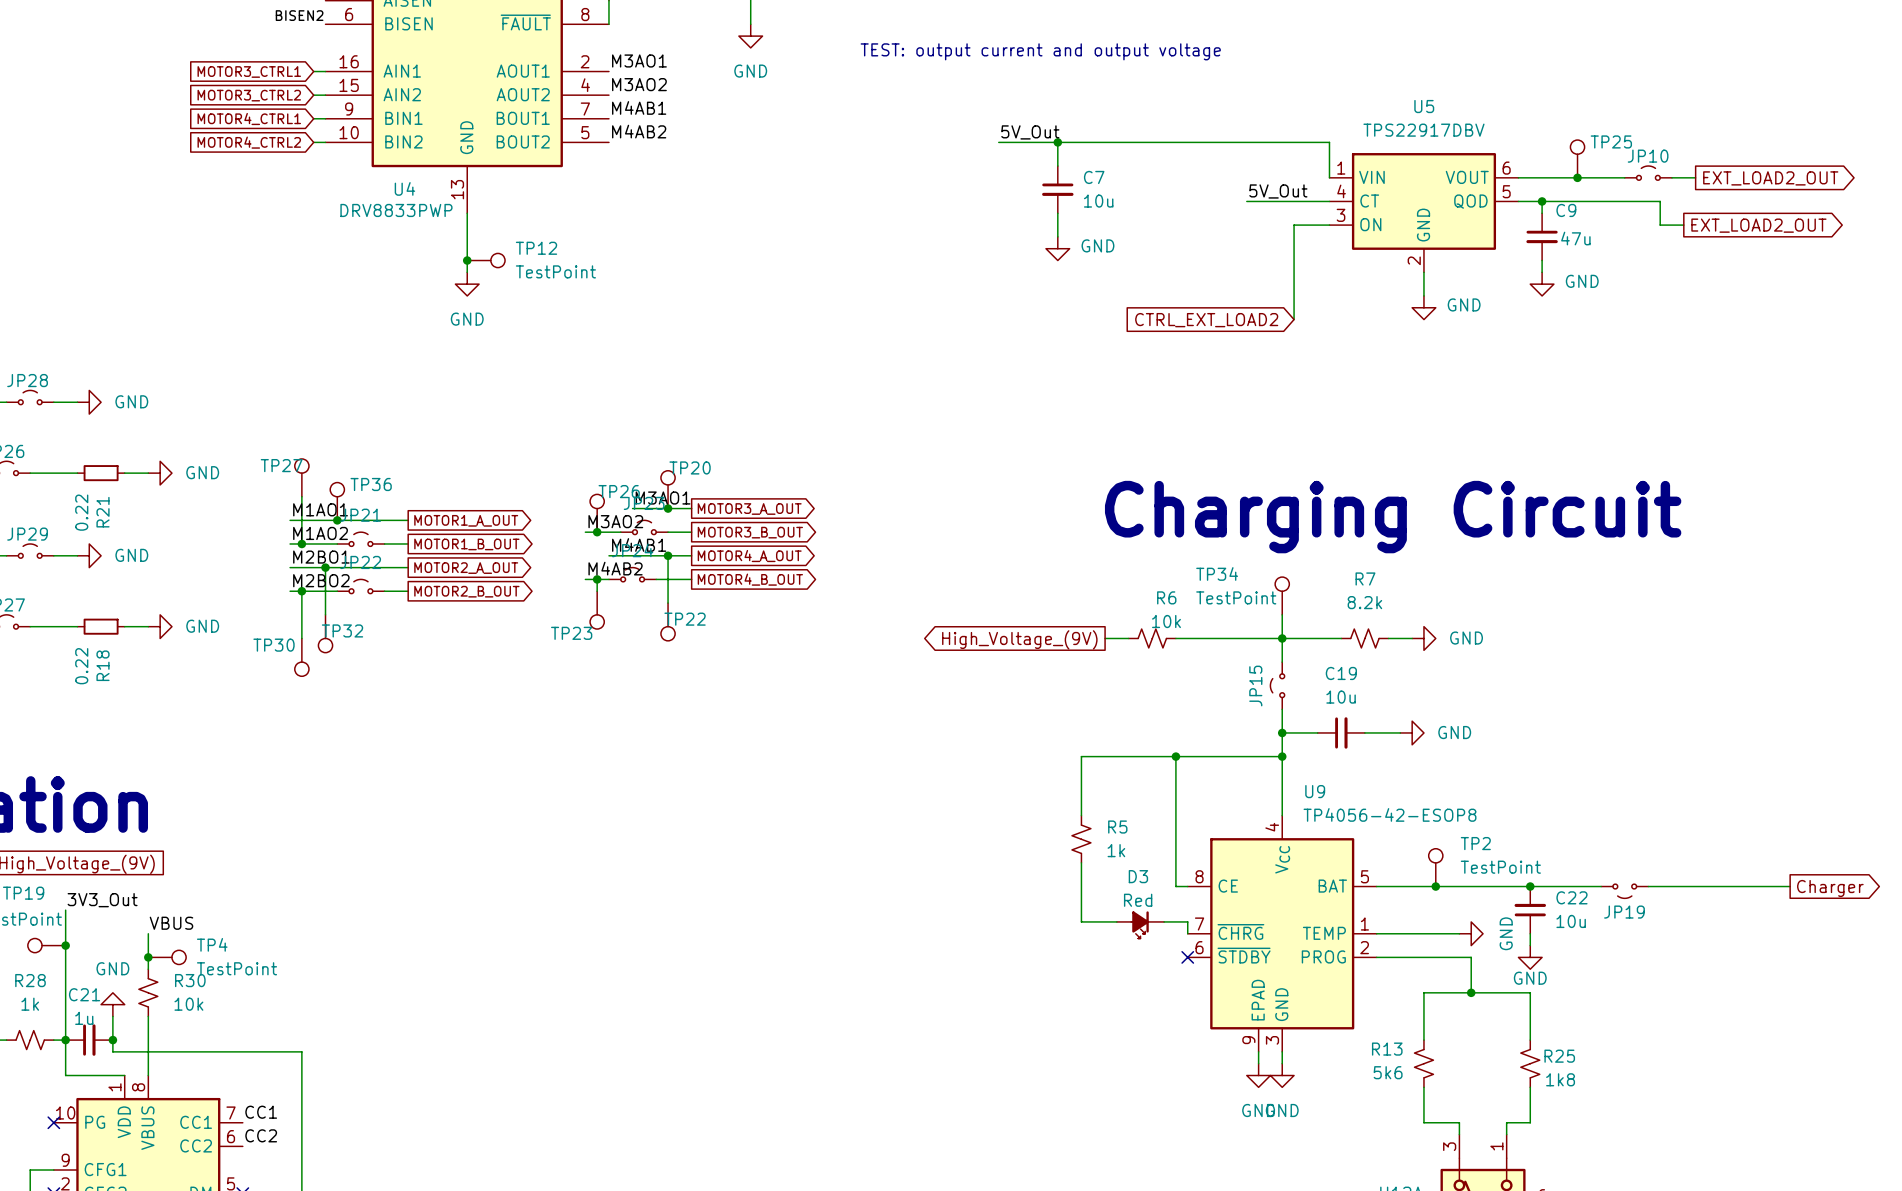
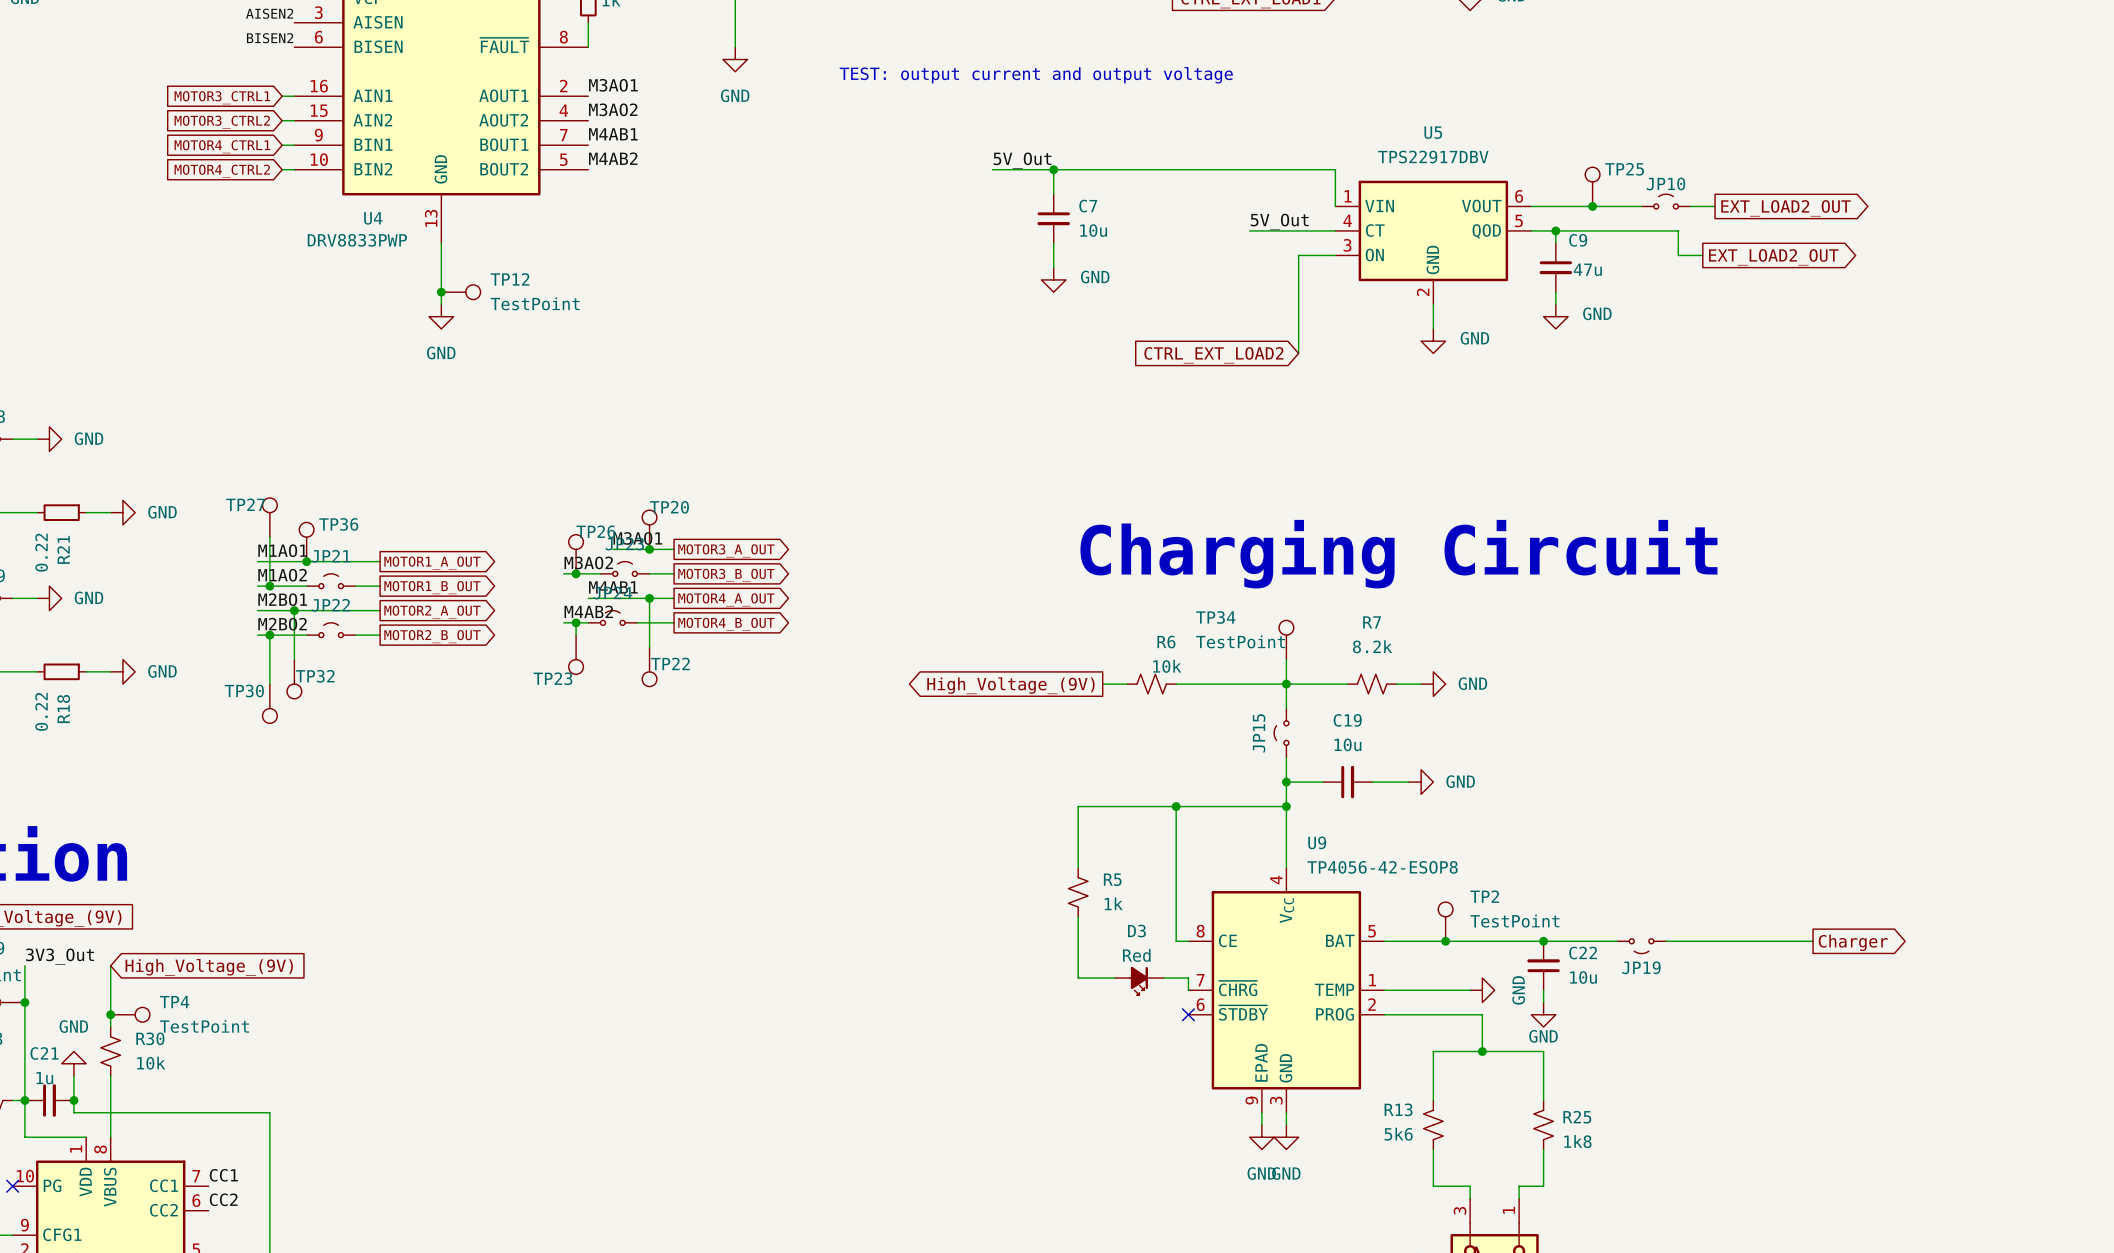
wire: none -> (110, 965) (110, 990)
global label: none -> High_Voltage_(9V) (209, 967)
label: VBUS (171, 923) -> none

